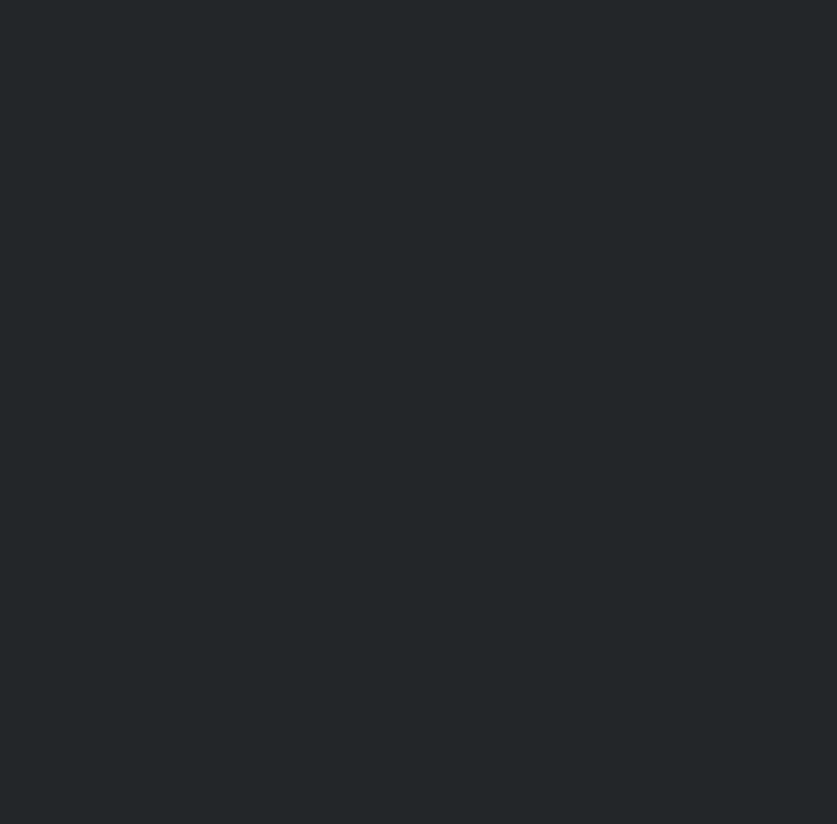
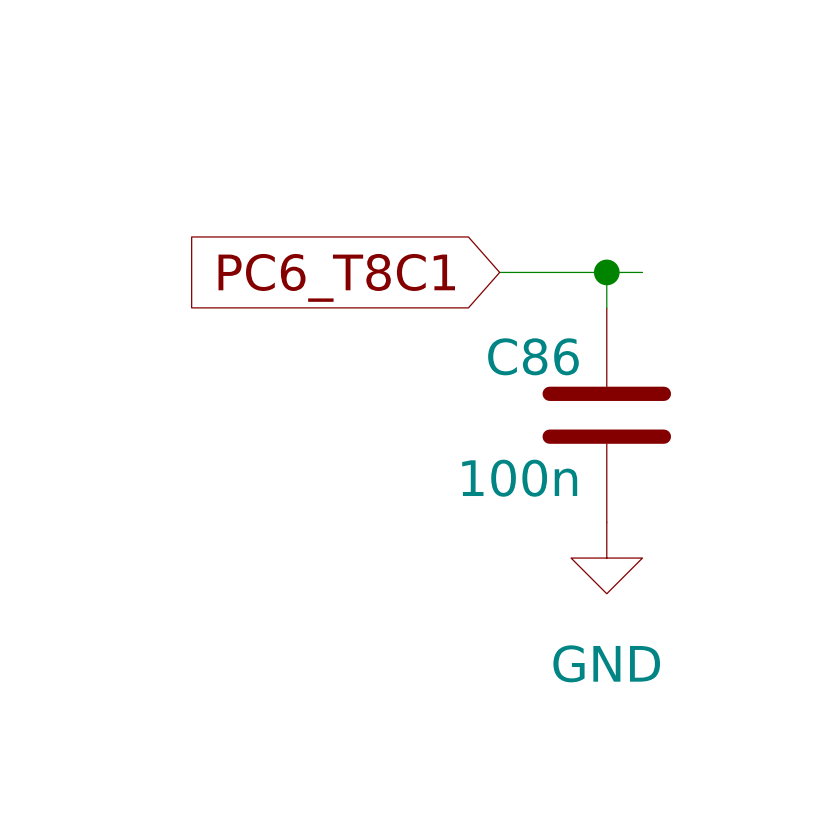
wire: none -> (499, 272) (642, 272)
wire: none -> (606, 272) (606, 308)
junction: none -> (606, 272)
global label: none -> PC6_T8C1 (336, 277)
C86: none -> 100n (606, 415)
power symbol: none -> GND (606, 558)

